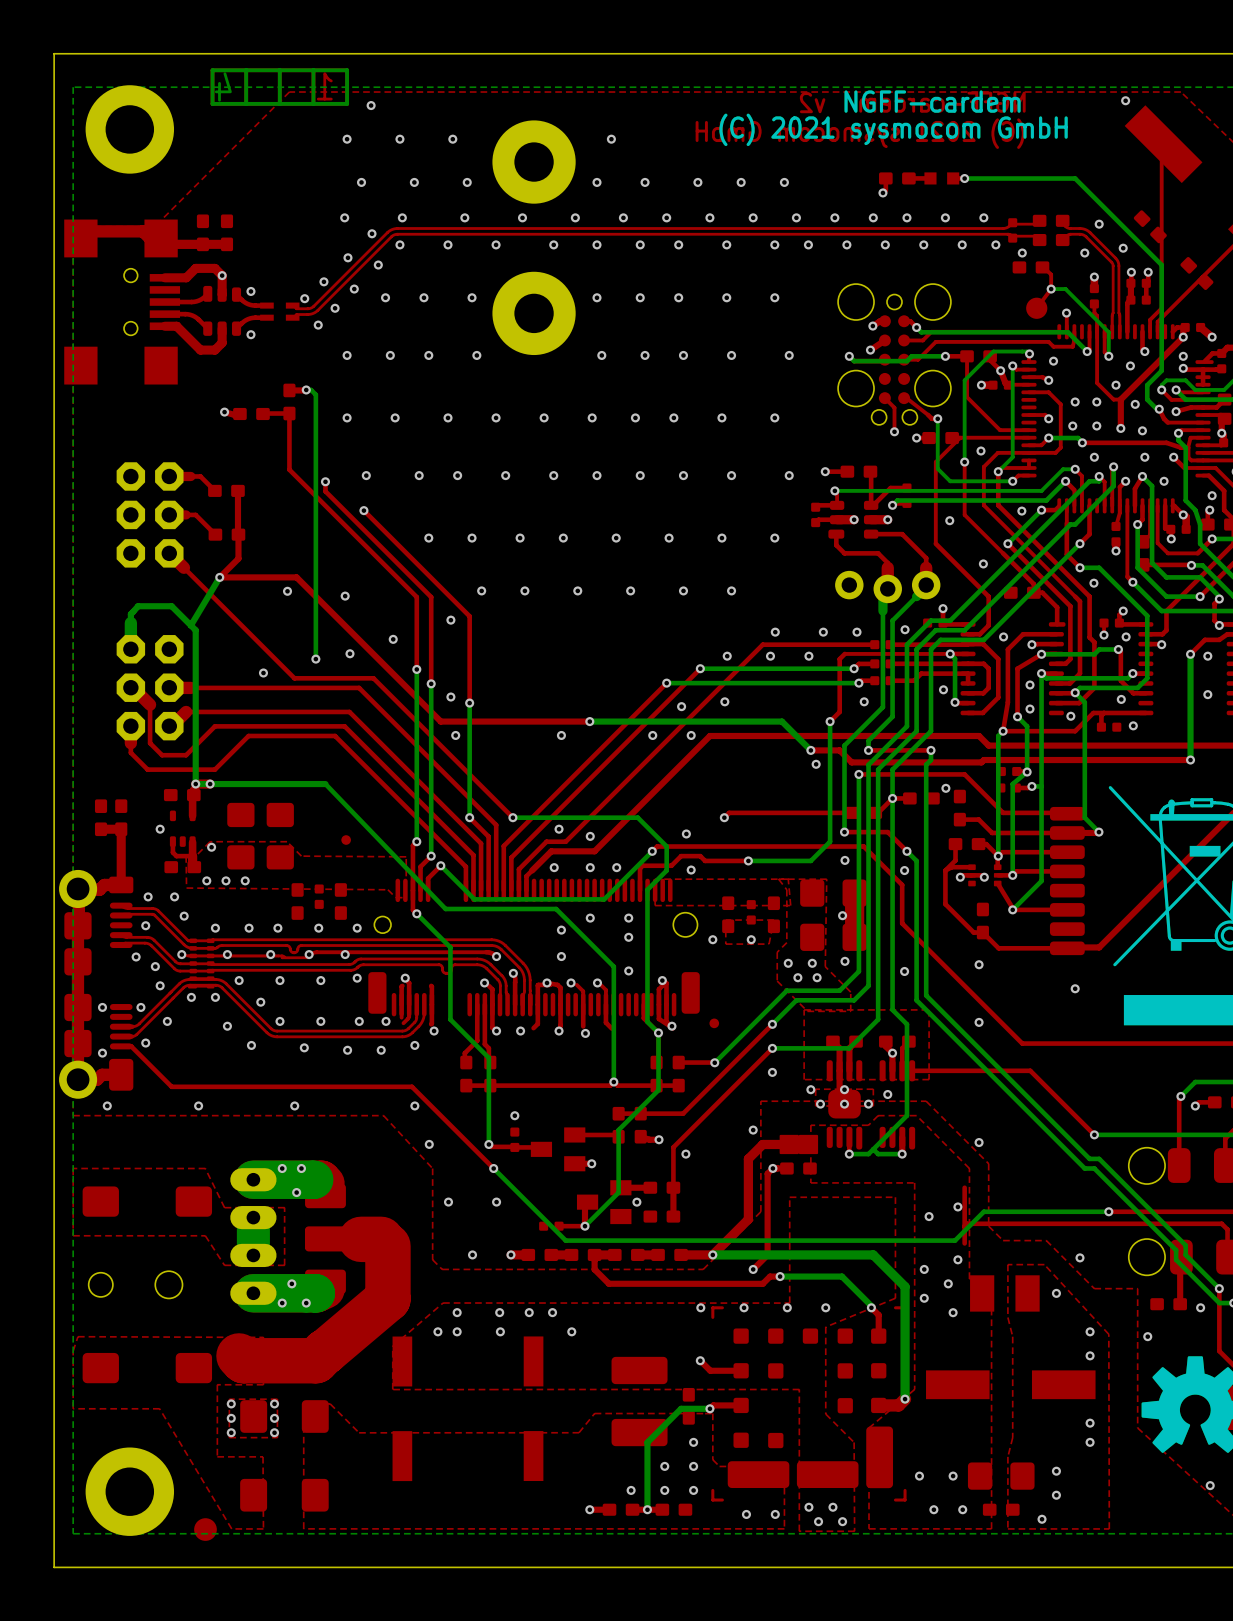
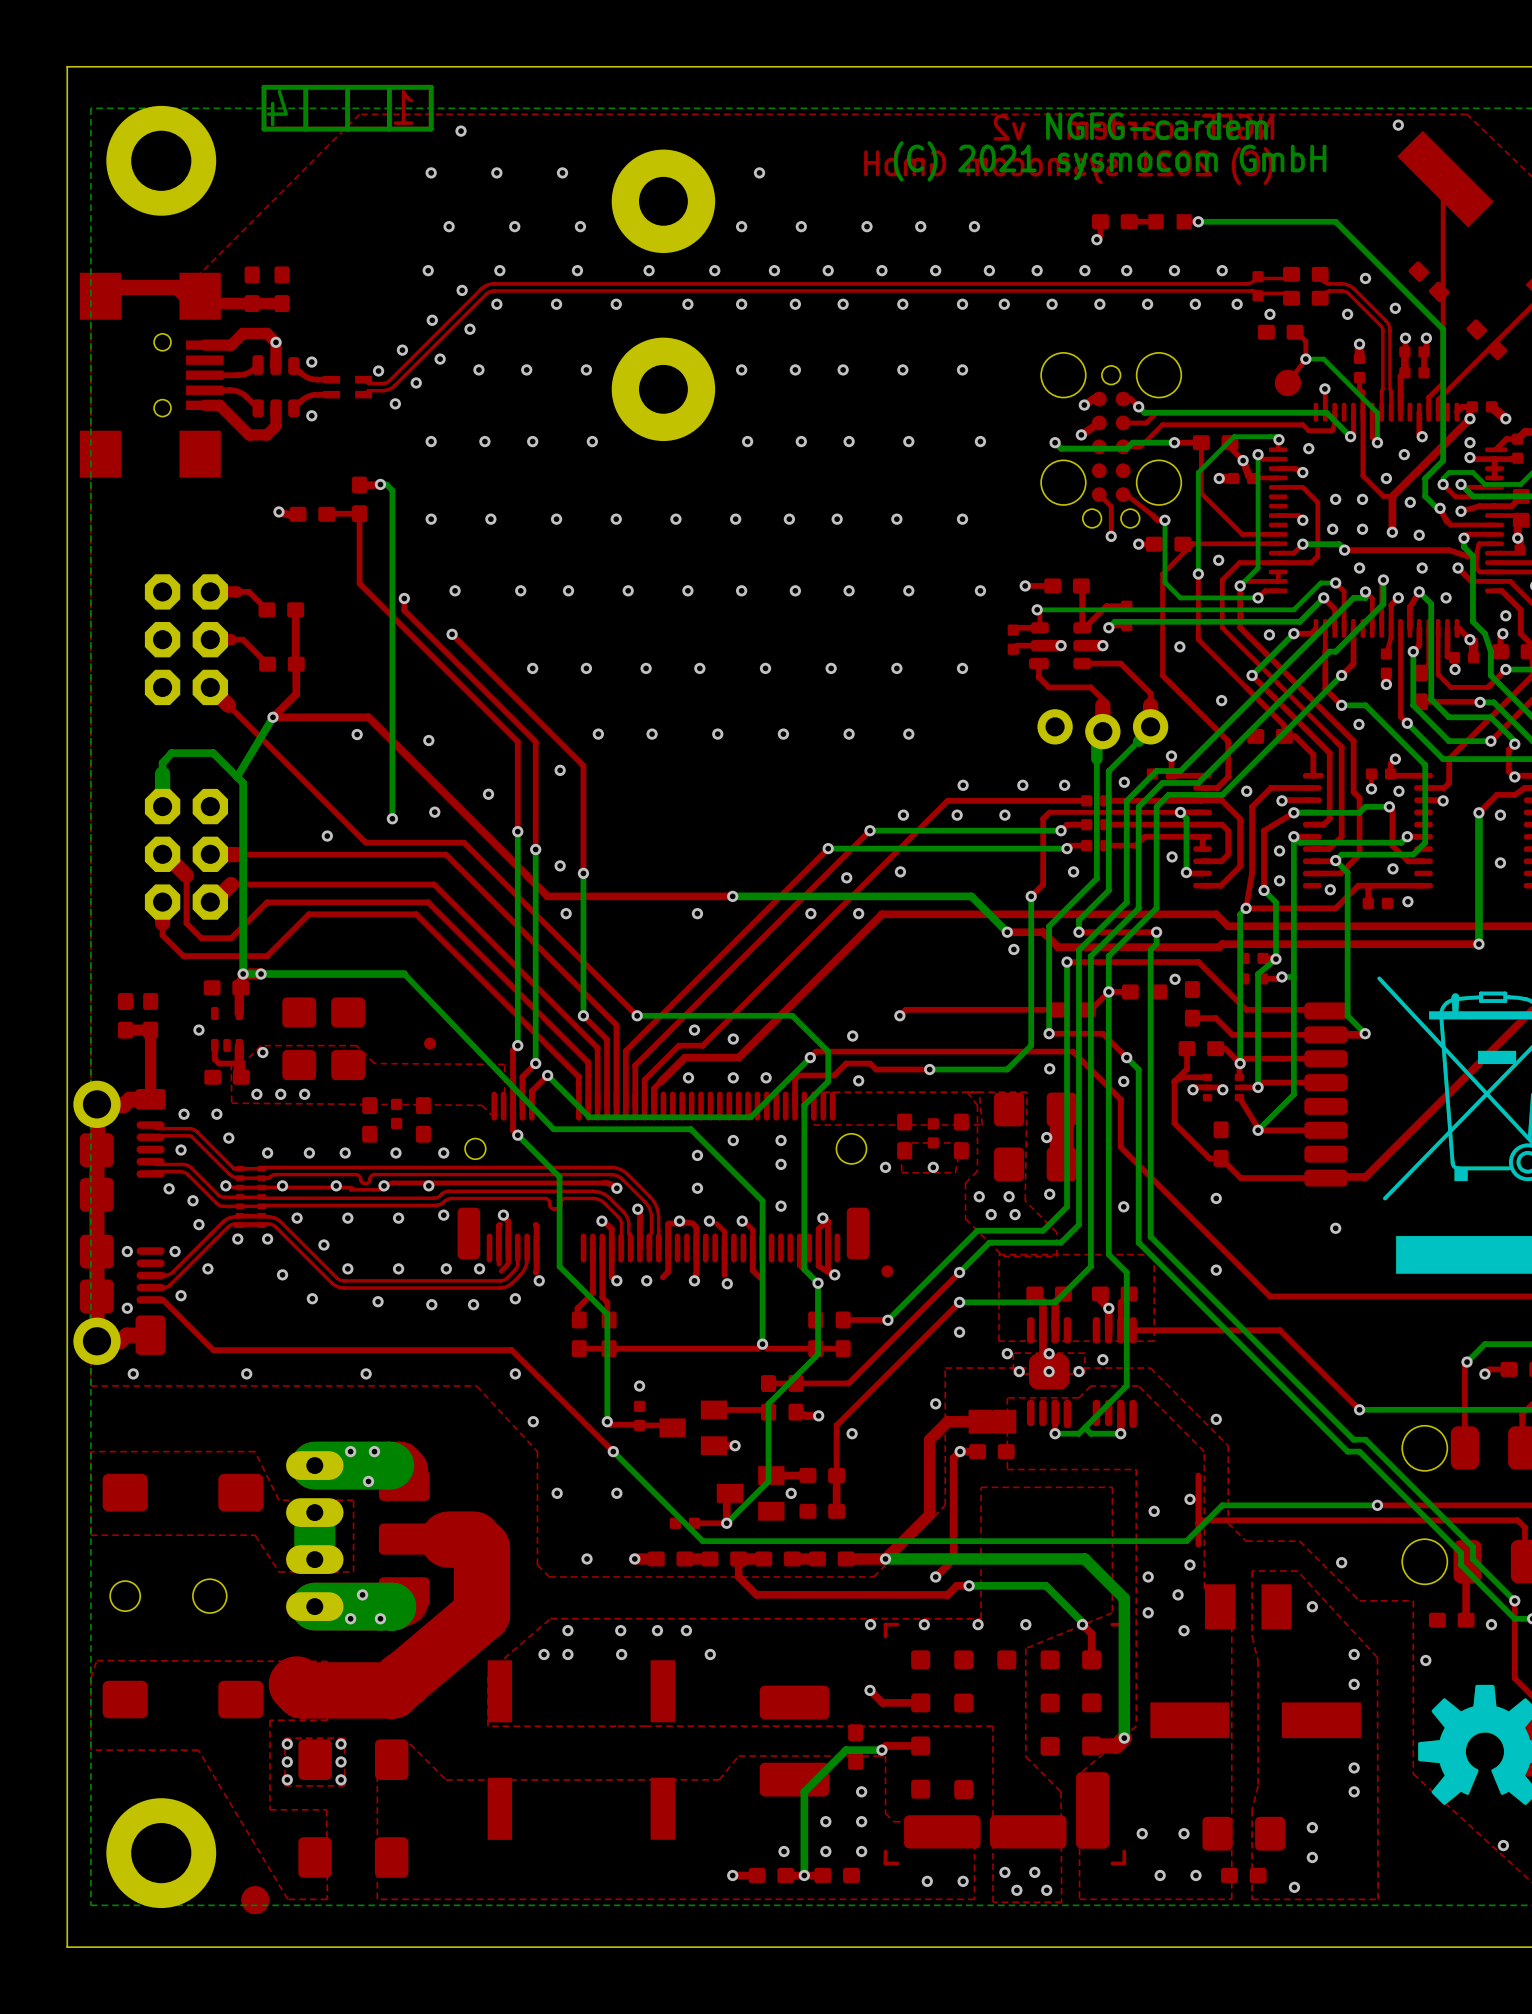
text: none -> NGFG-cardem (1156, 126)
text: NGFF-cardem (932, 101) -> none
text: (C) 2021 sysmocom GmbH (893, 129) -> none

